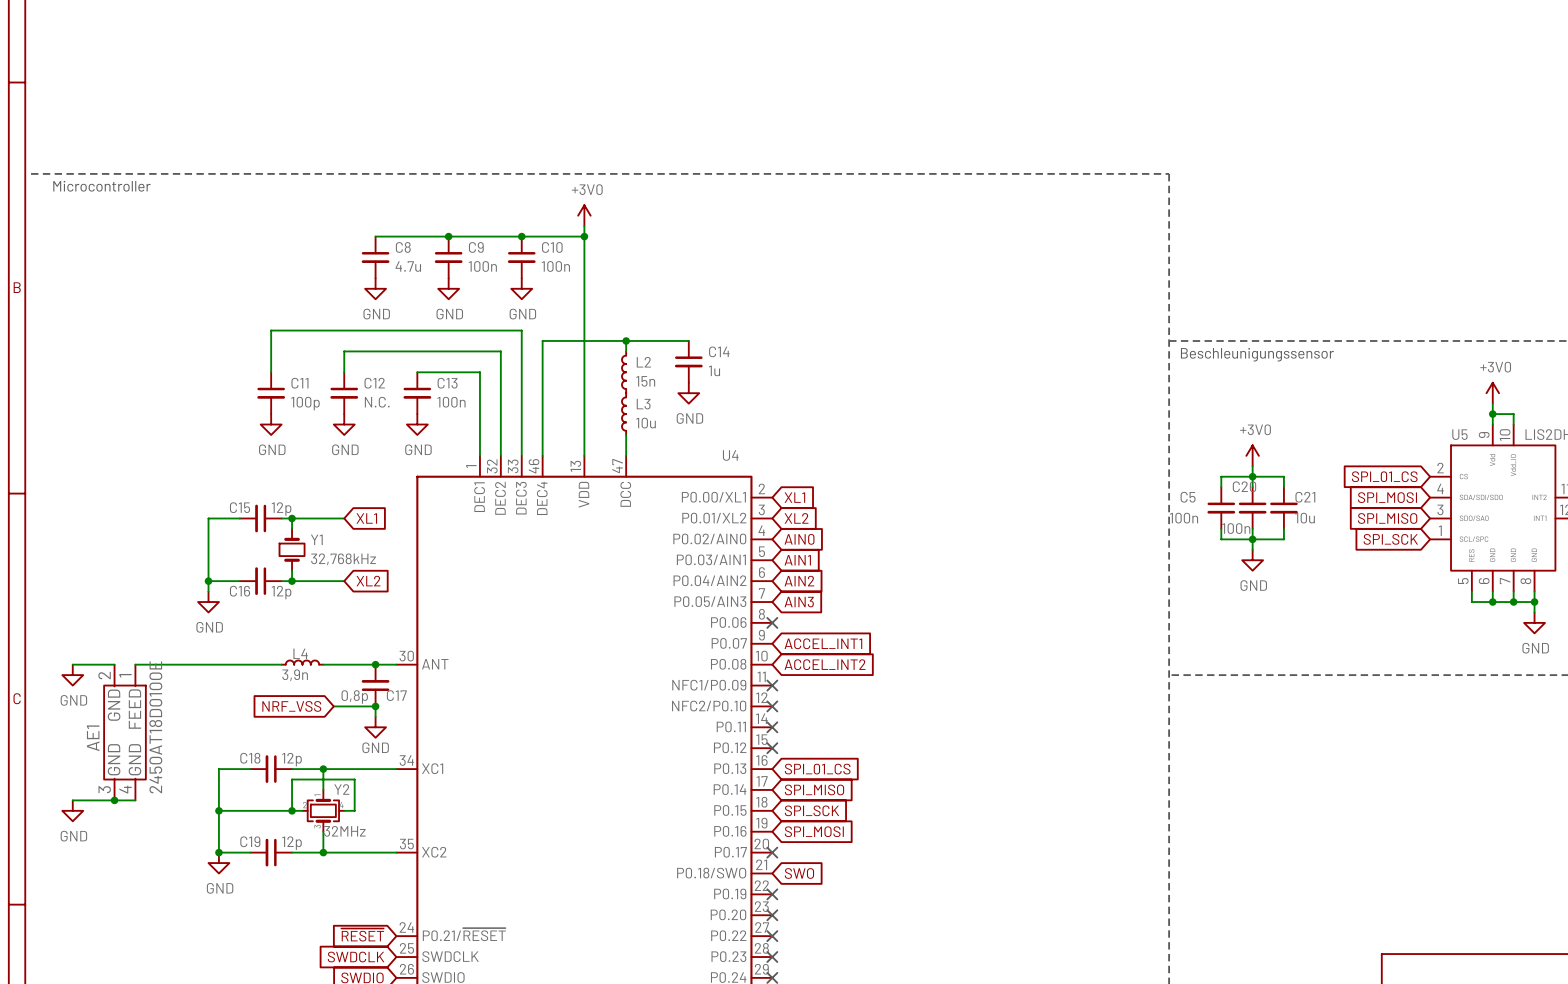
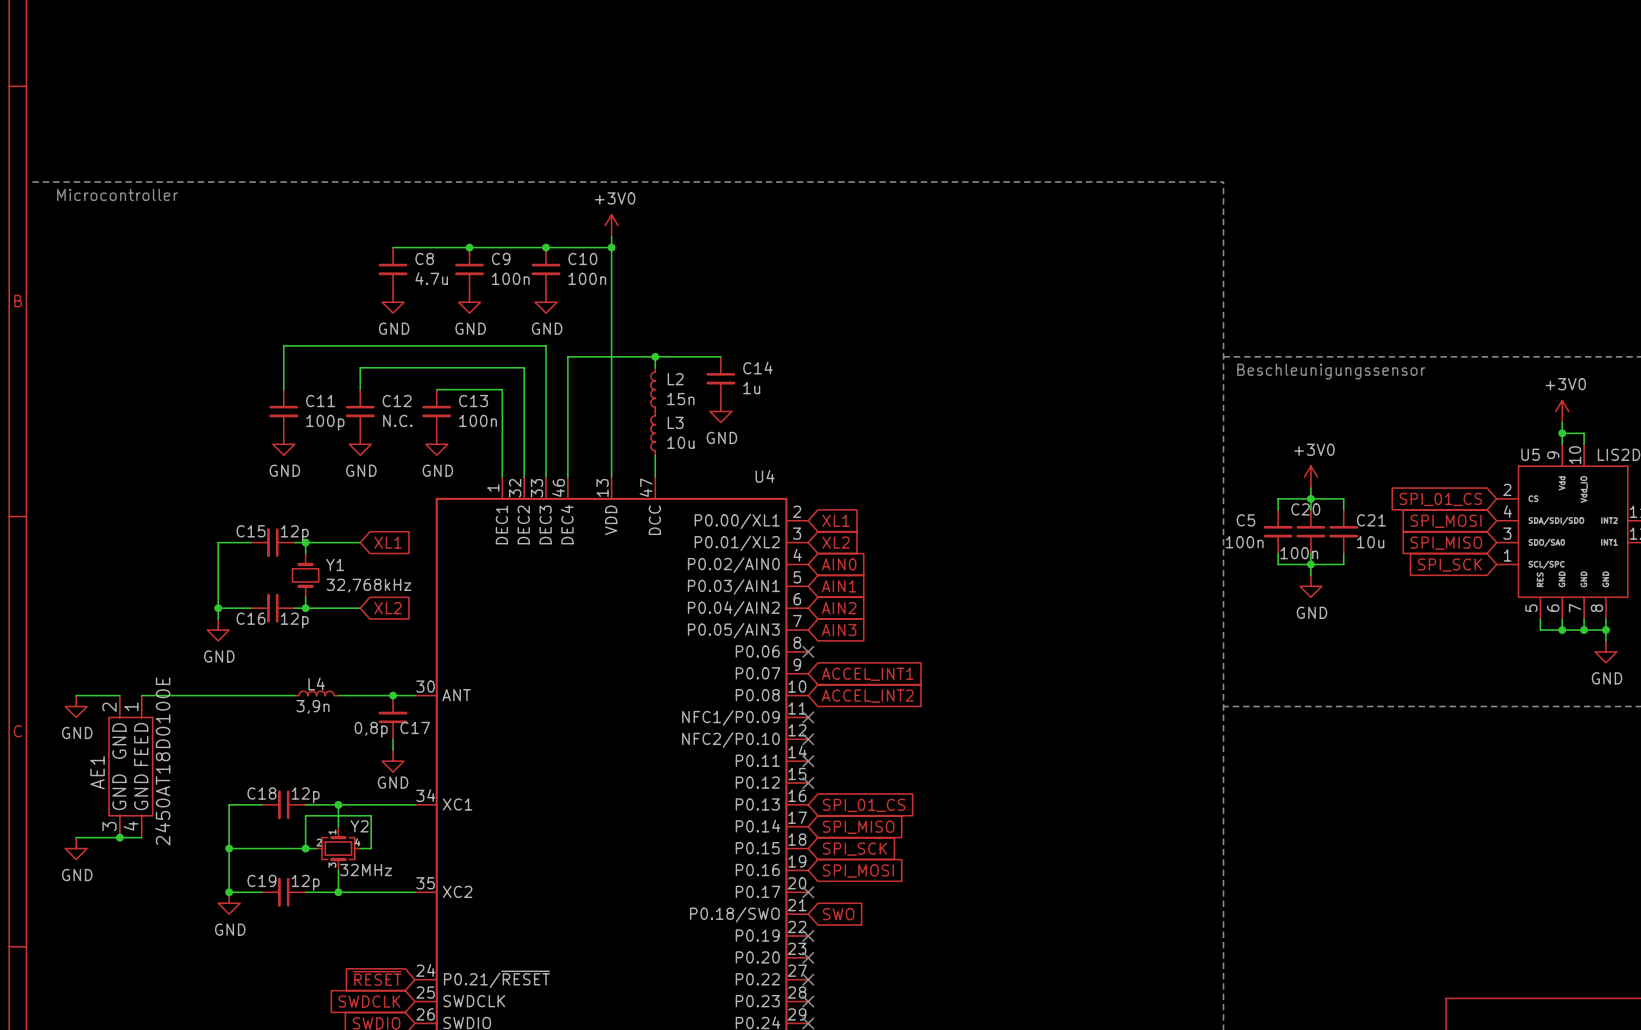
global label: NRF_VSS (291, 706) -> none
wire: (333, 706) (375, 706) -> none
junction: (375, 706) -> none

